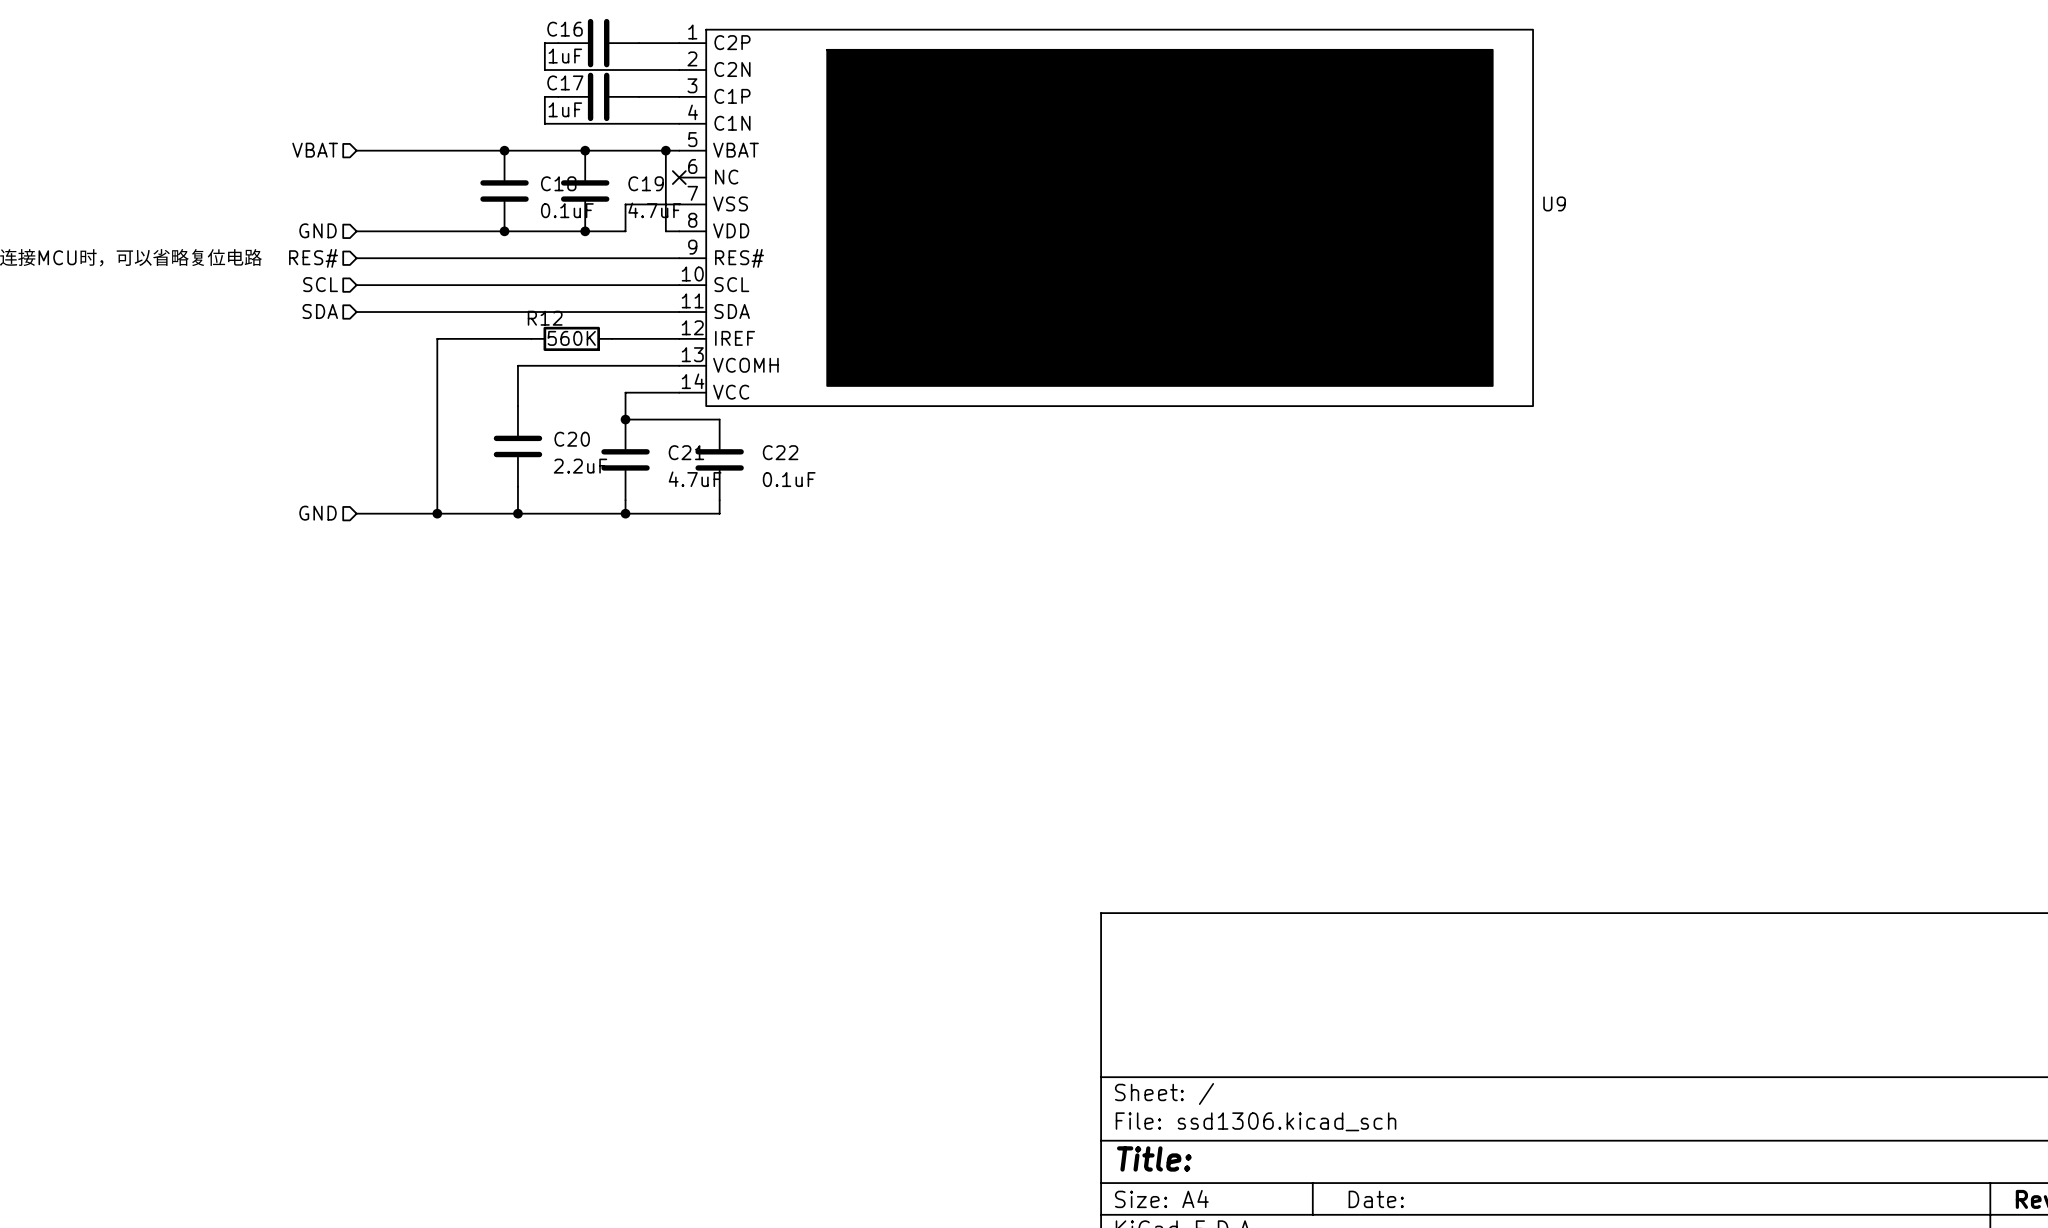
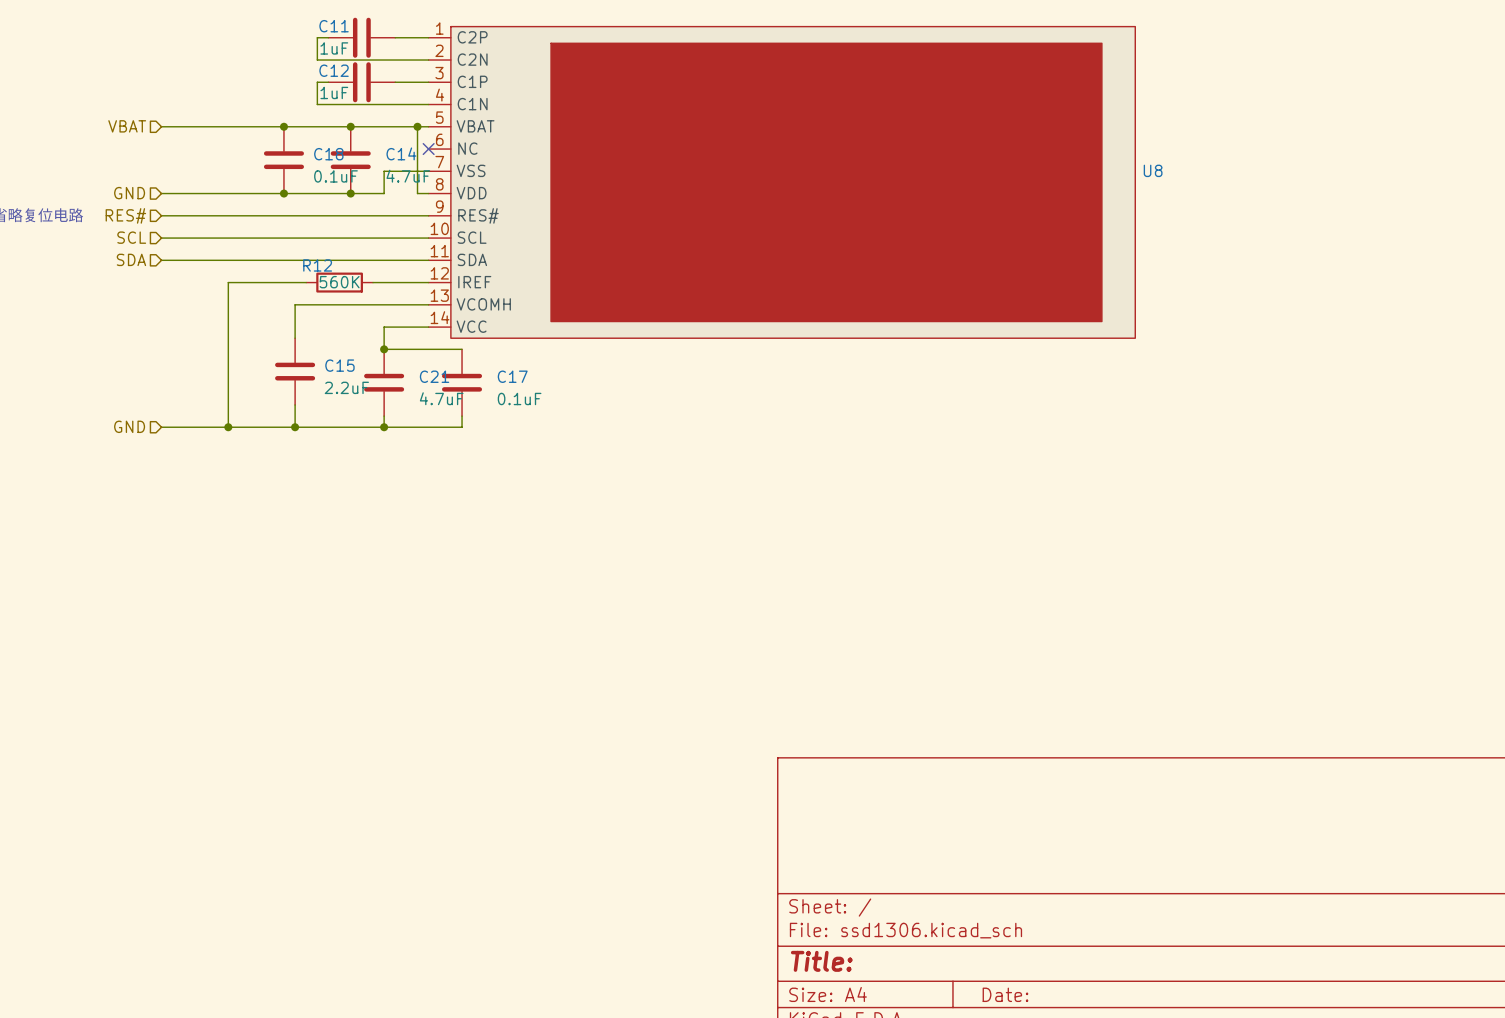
C16 name: C16 (565, 29) -> C11 (334, 26)
C17 name: C17 (565, 82) -> C12 (334, 70)
C19 name: C19 (646, 183) -> C14 (401, 153)
U9 name: U9 (1554, 203) -> U8 (1153, 170)
C20 name: C20 (572, 439) -> C15 (339, 365)
C22 name: C22 (780, 452) -> C17 (512, 376)

